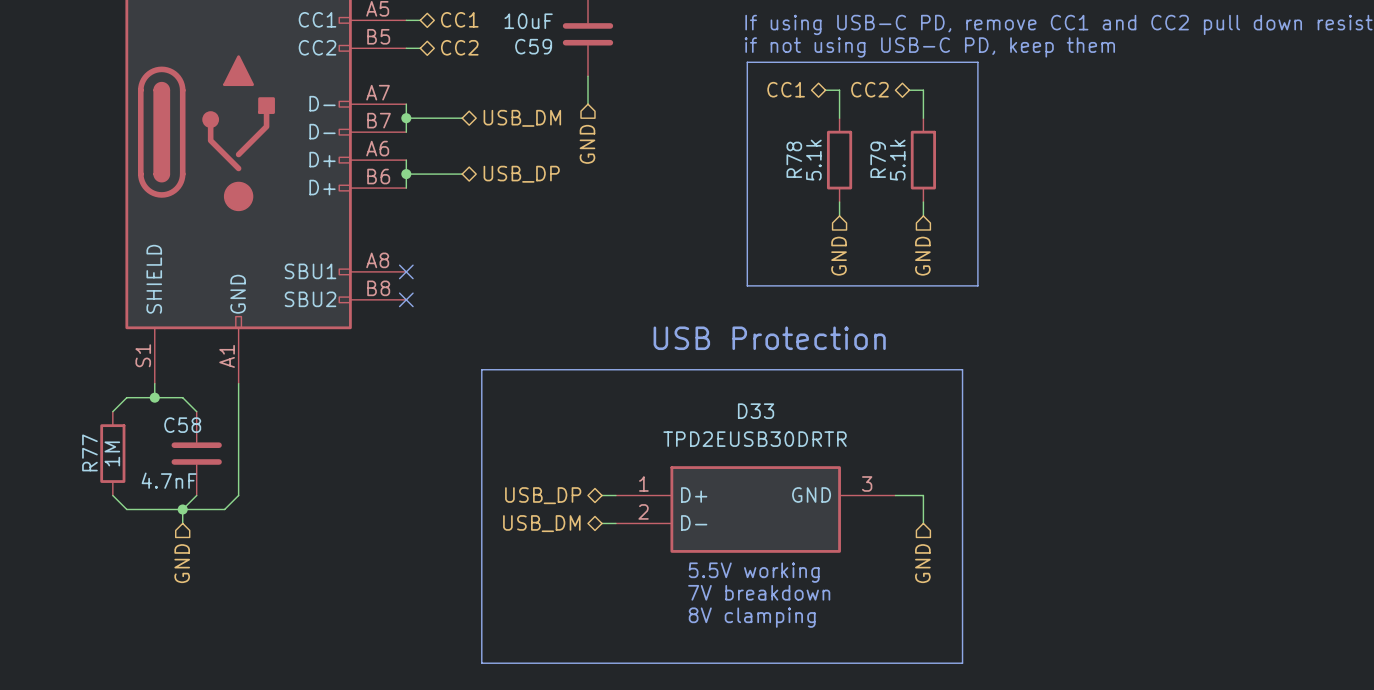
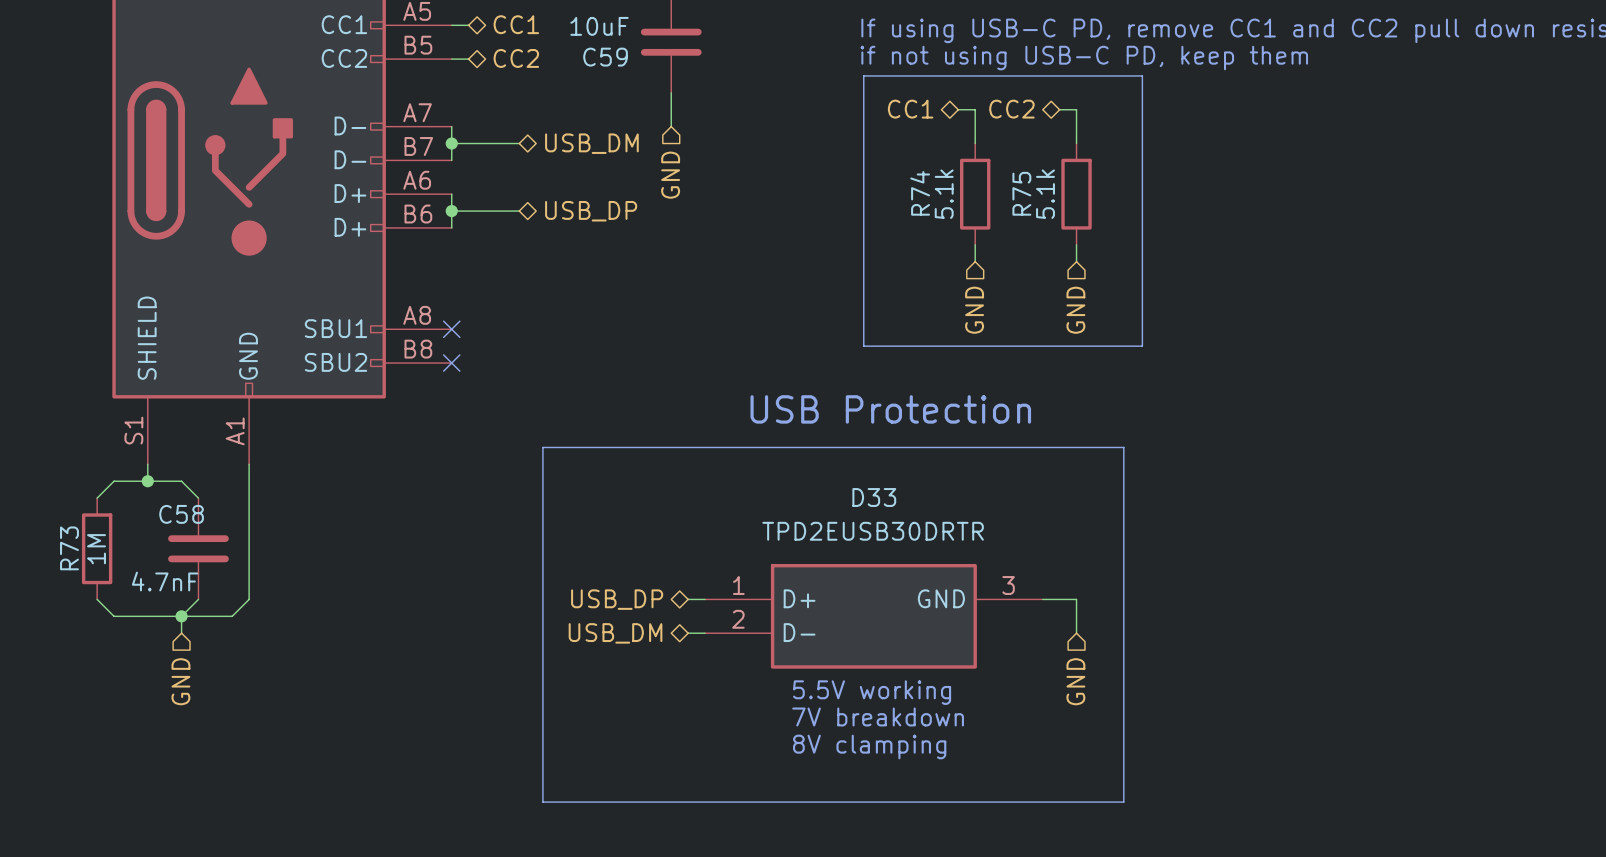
R78 name: R78 (794, 159) -> R74 (920, 193)
R79 name: R79 (878, 159) -> R75 (1021, 193)
R77 name: R77 (89, 452) -> R73 (69, 548)

